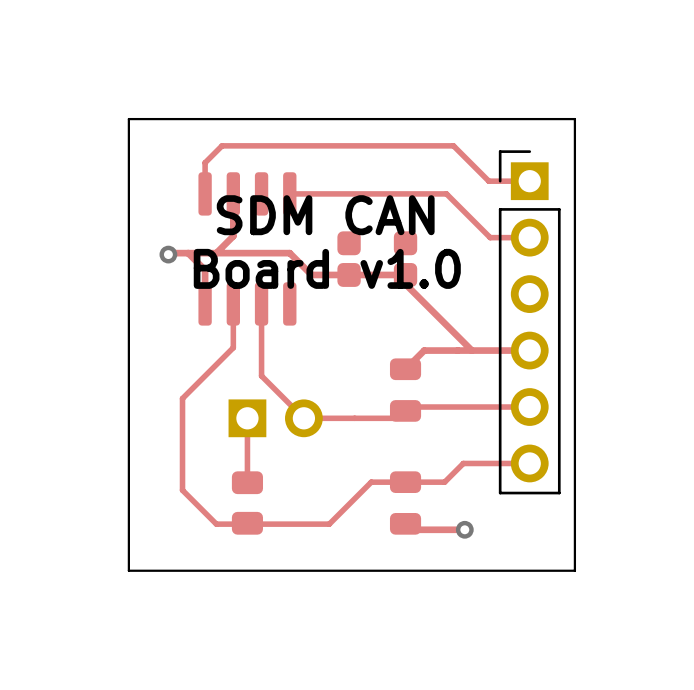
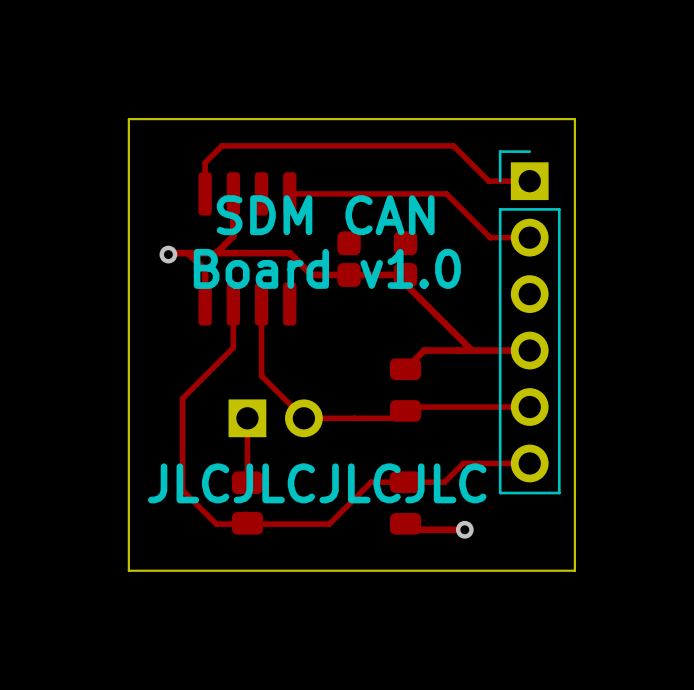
text: none -> JLCJLCJLCJLC (317, 483)

